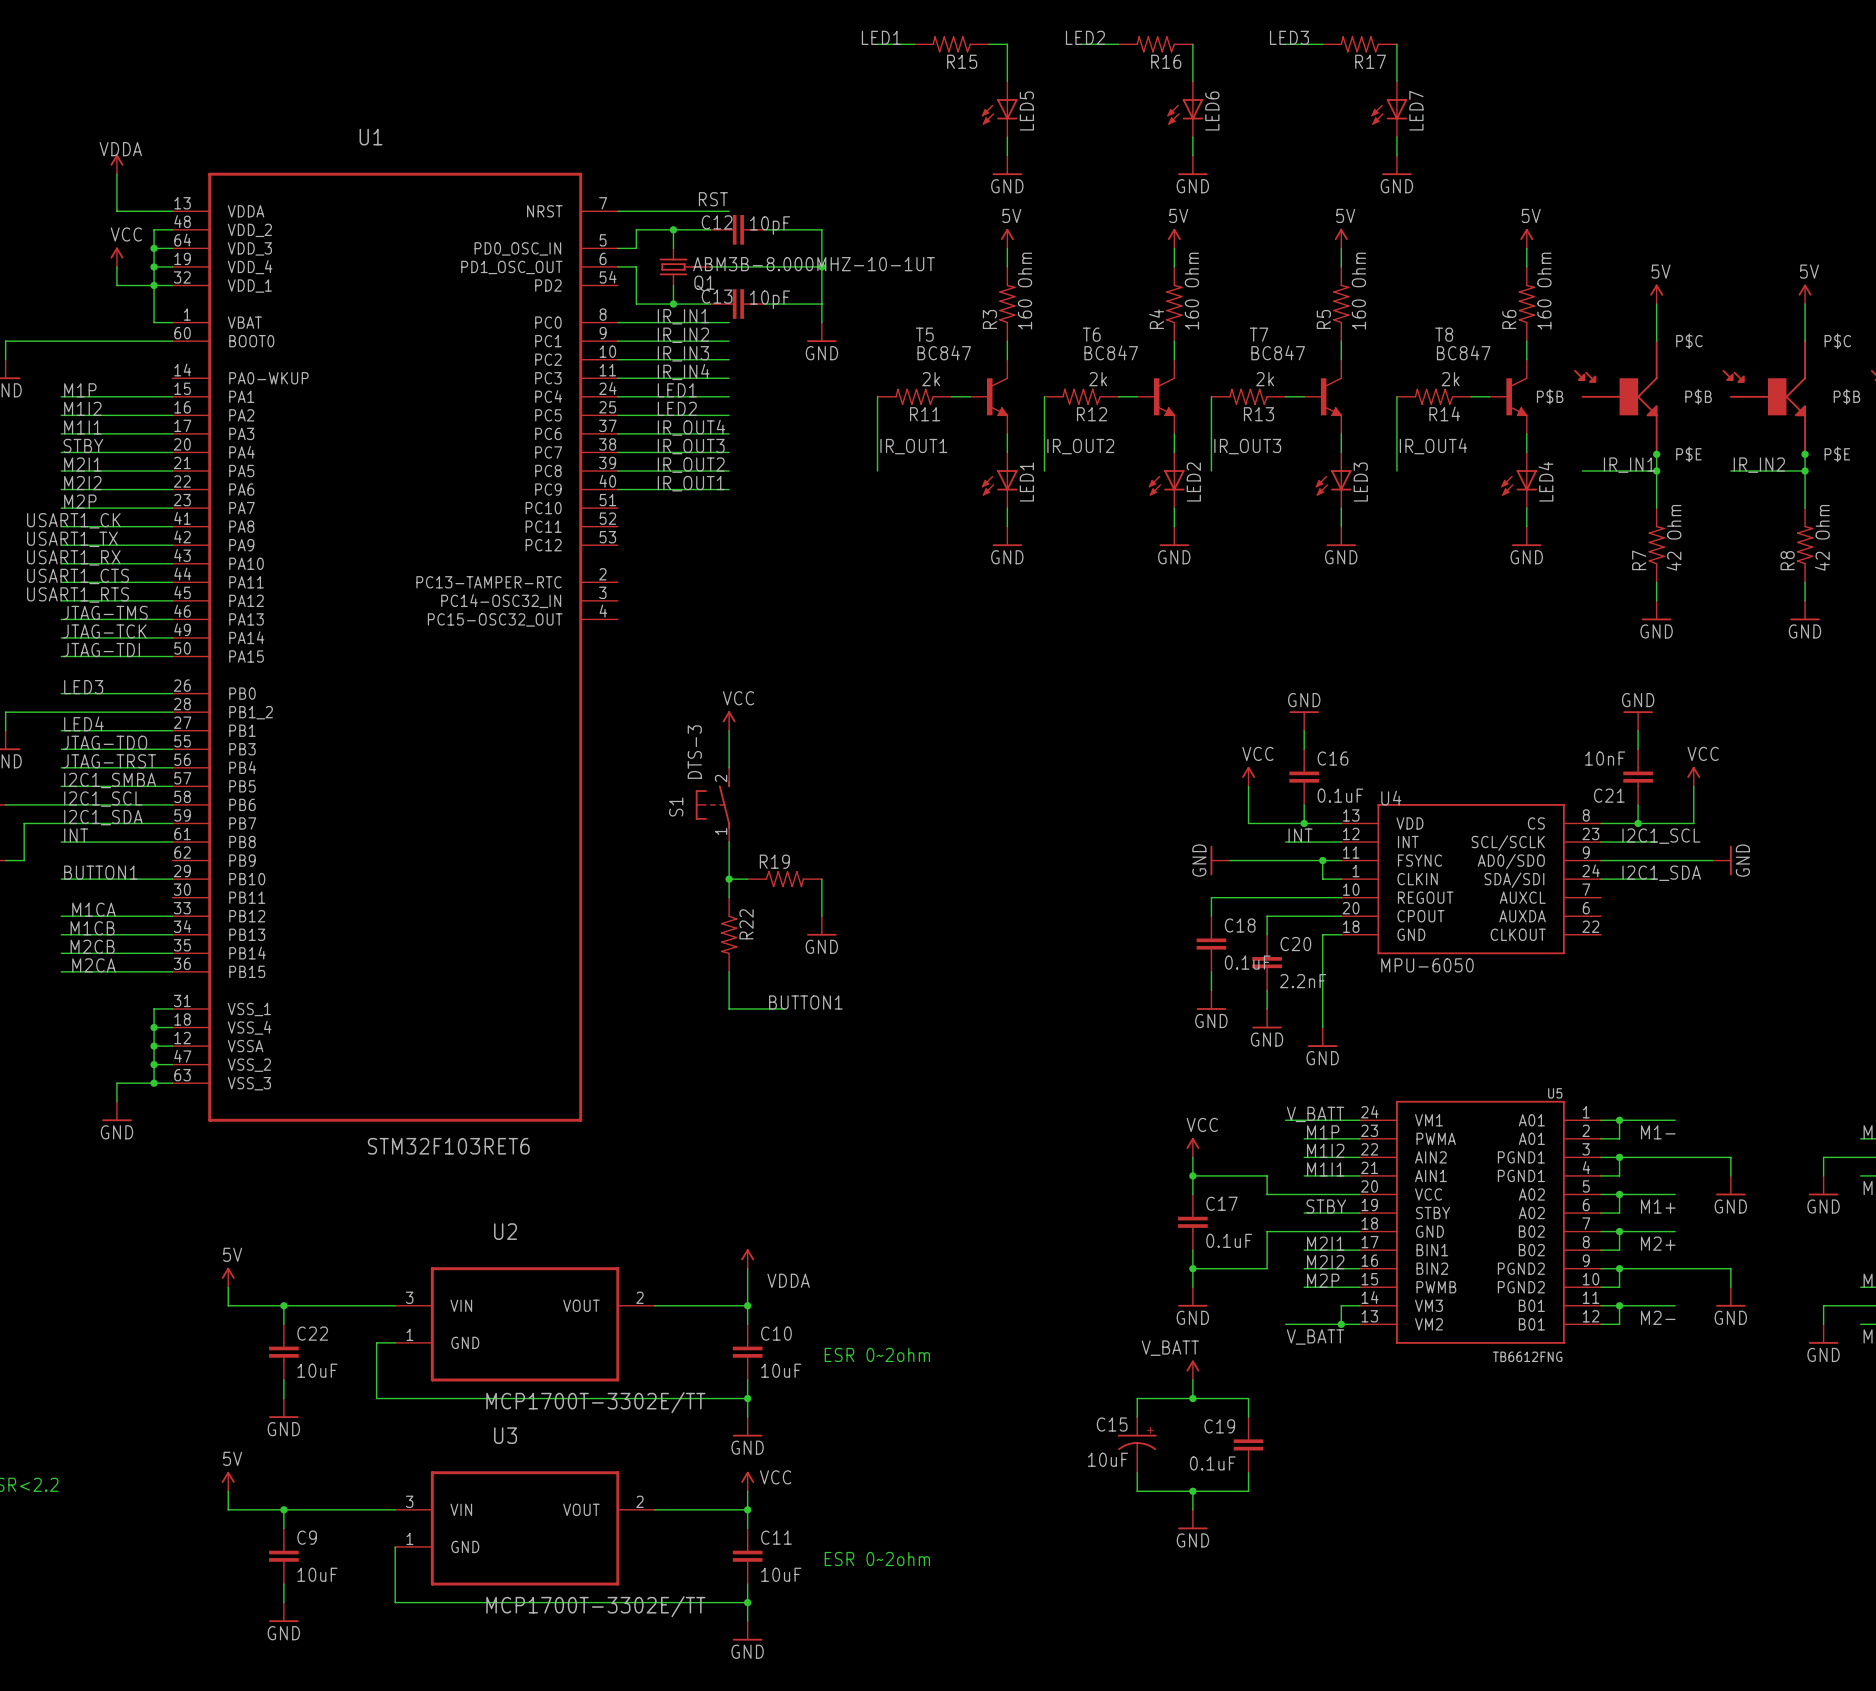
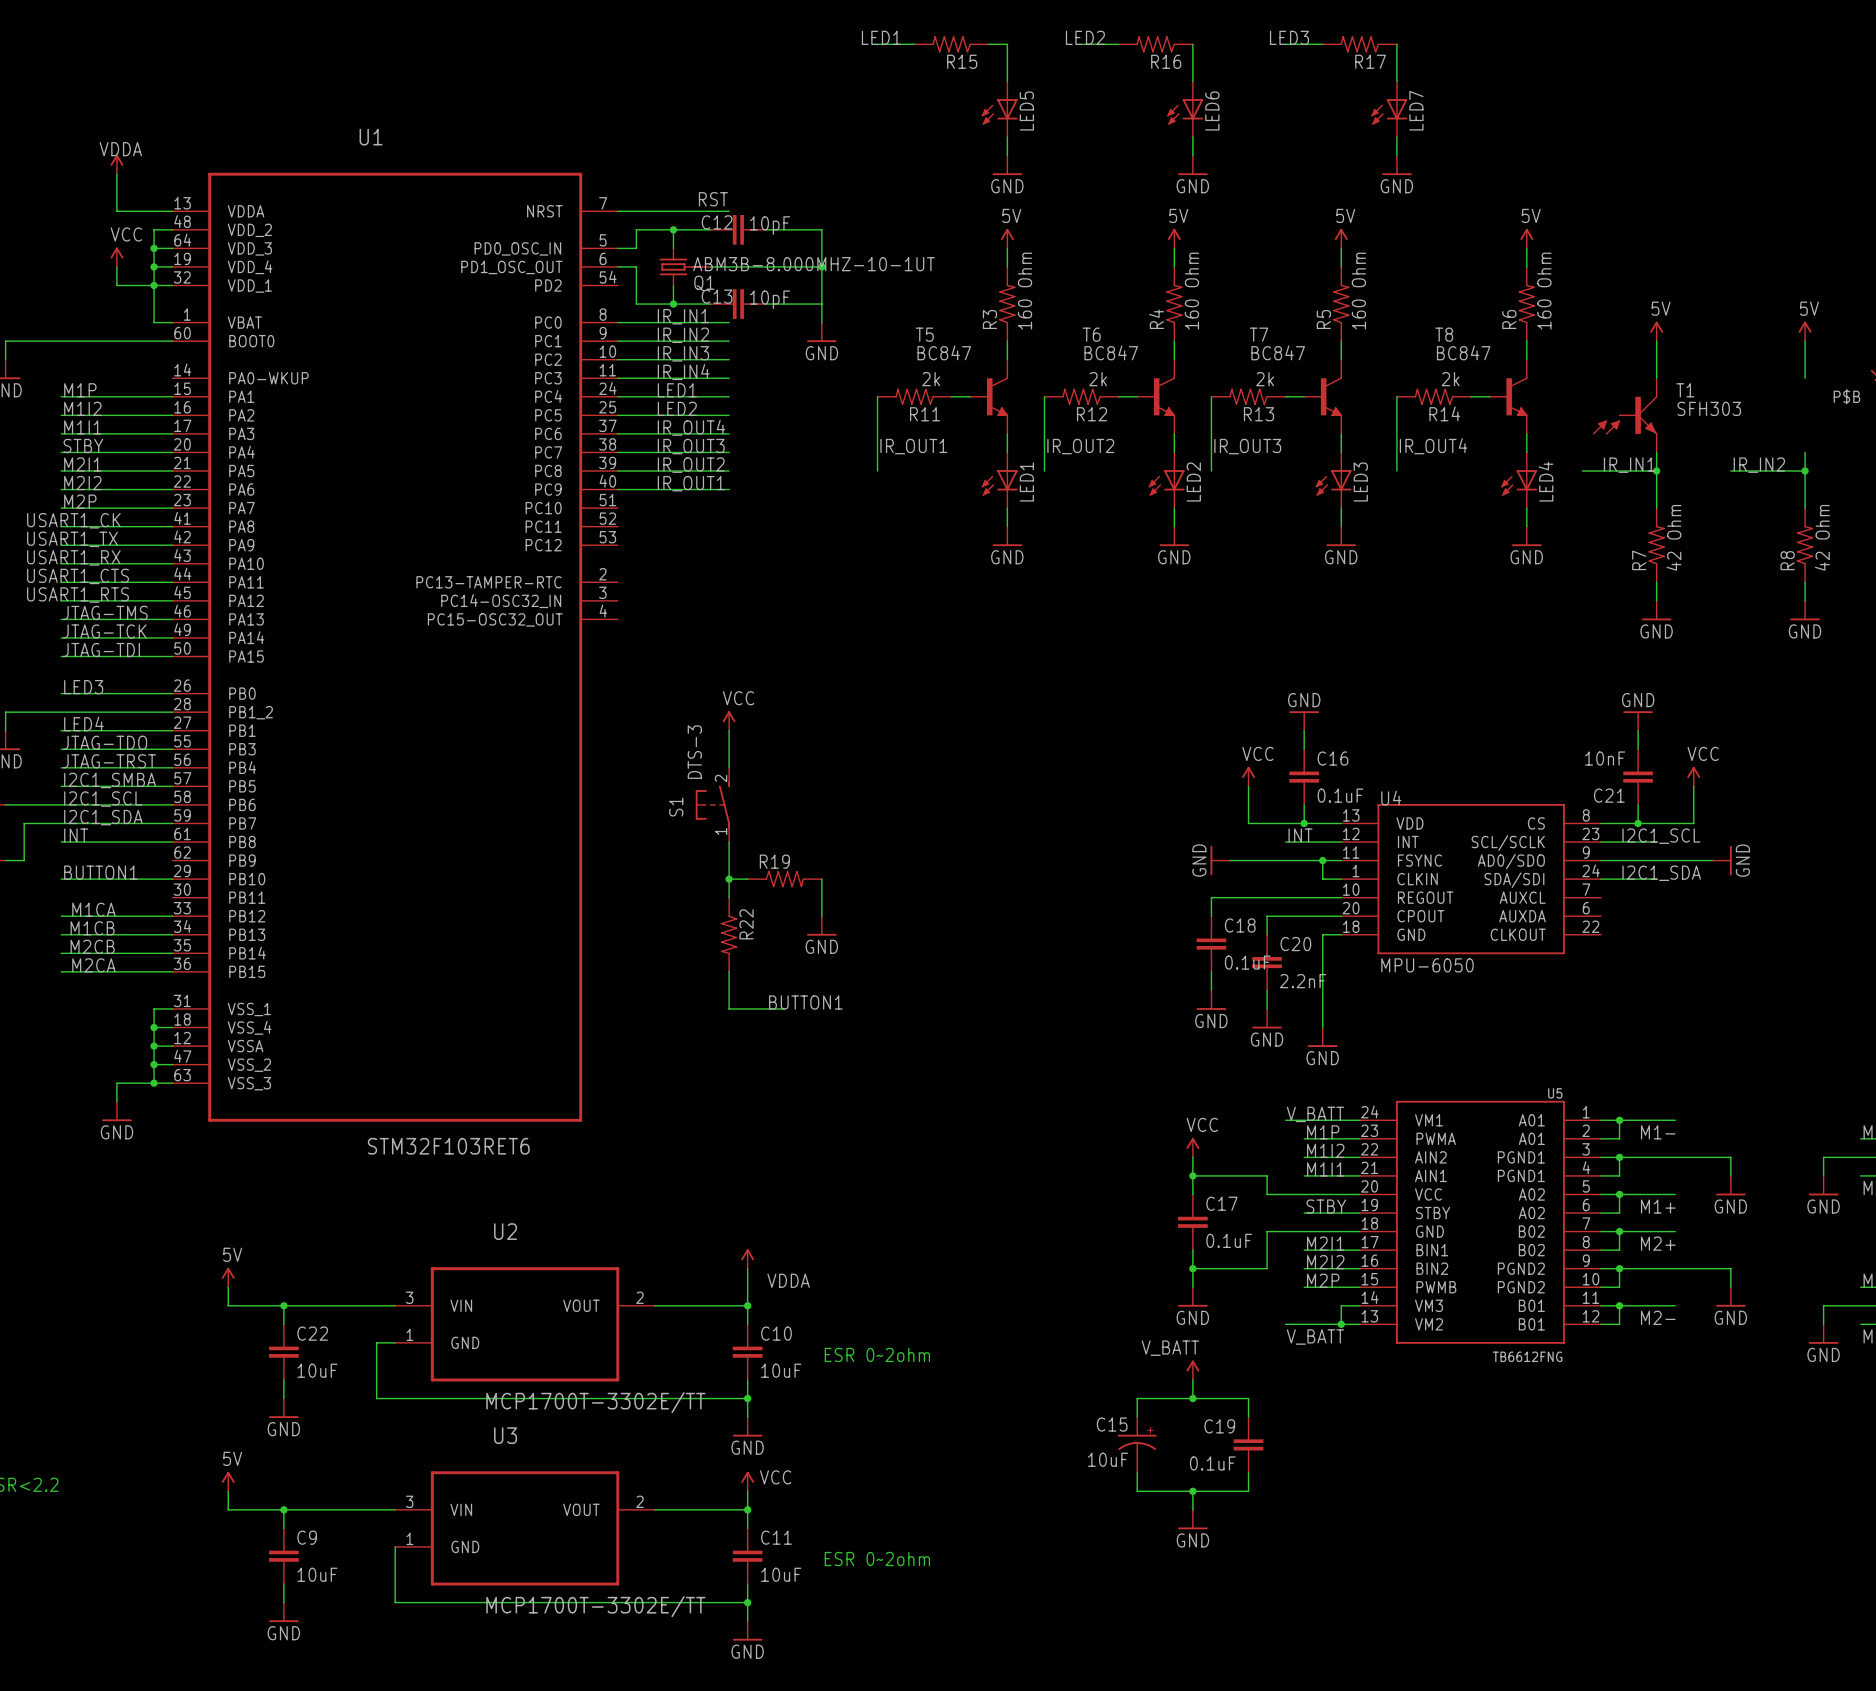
power symbol position: 5V (1656, 294) -> 5V (1656, 331)
power symbol position: 5V (1805, 294) -> 5V (1805, 331)
part: (1615, 396) -> none
part: (1764, 396) -> none
T1: none -> SFH303 (1625, 415)
junction: (1656, 454) -> none
junction: (1805, 454) -> none

